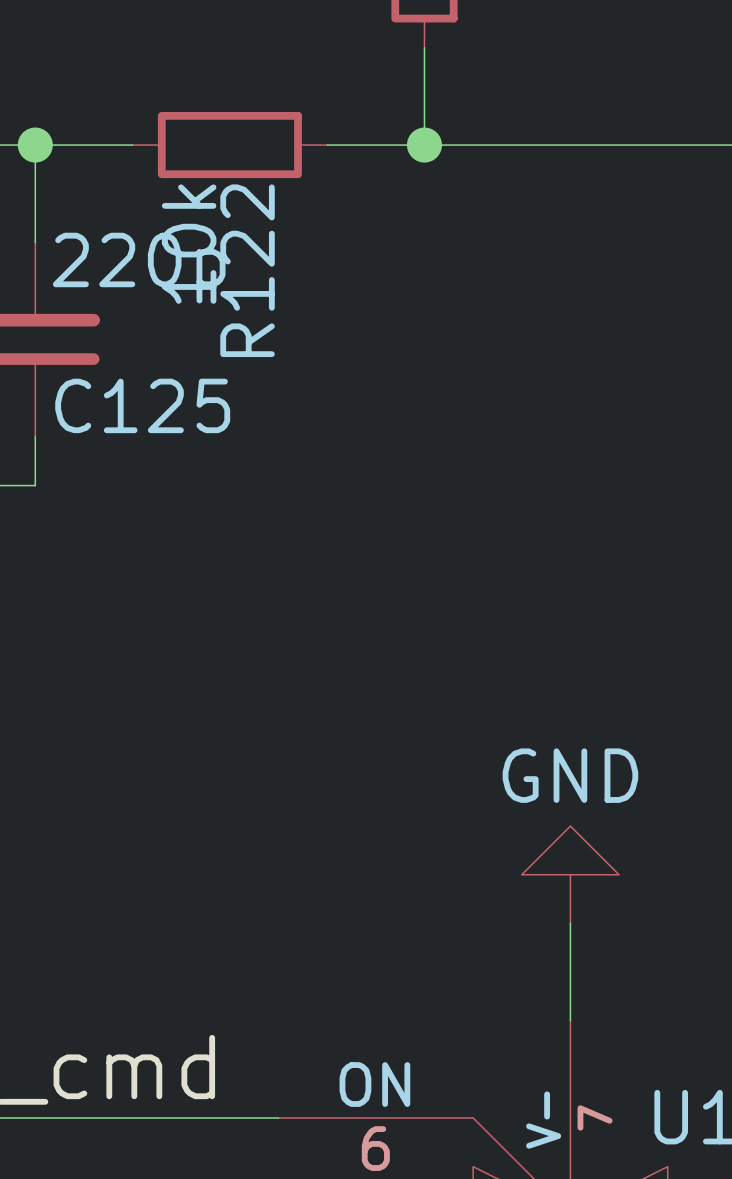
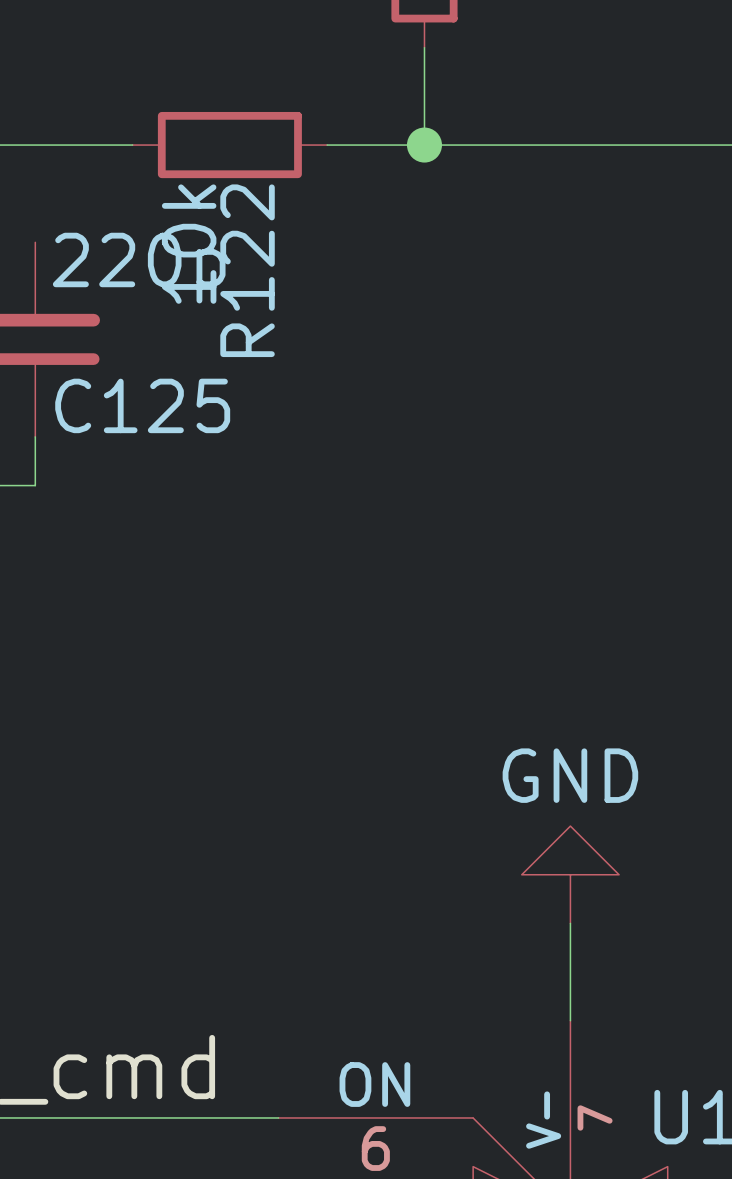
wire: (35, 145) (35, 242) -> none
junction: (35, 145) -> none

